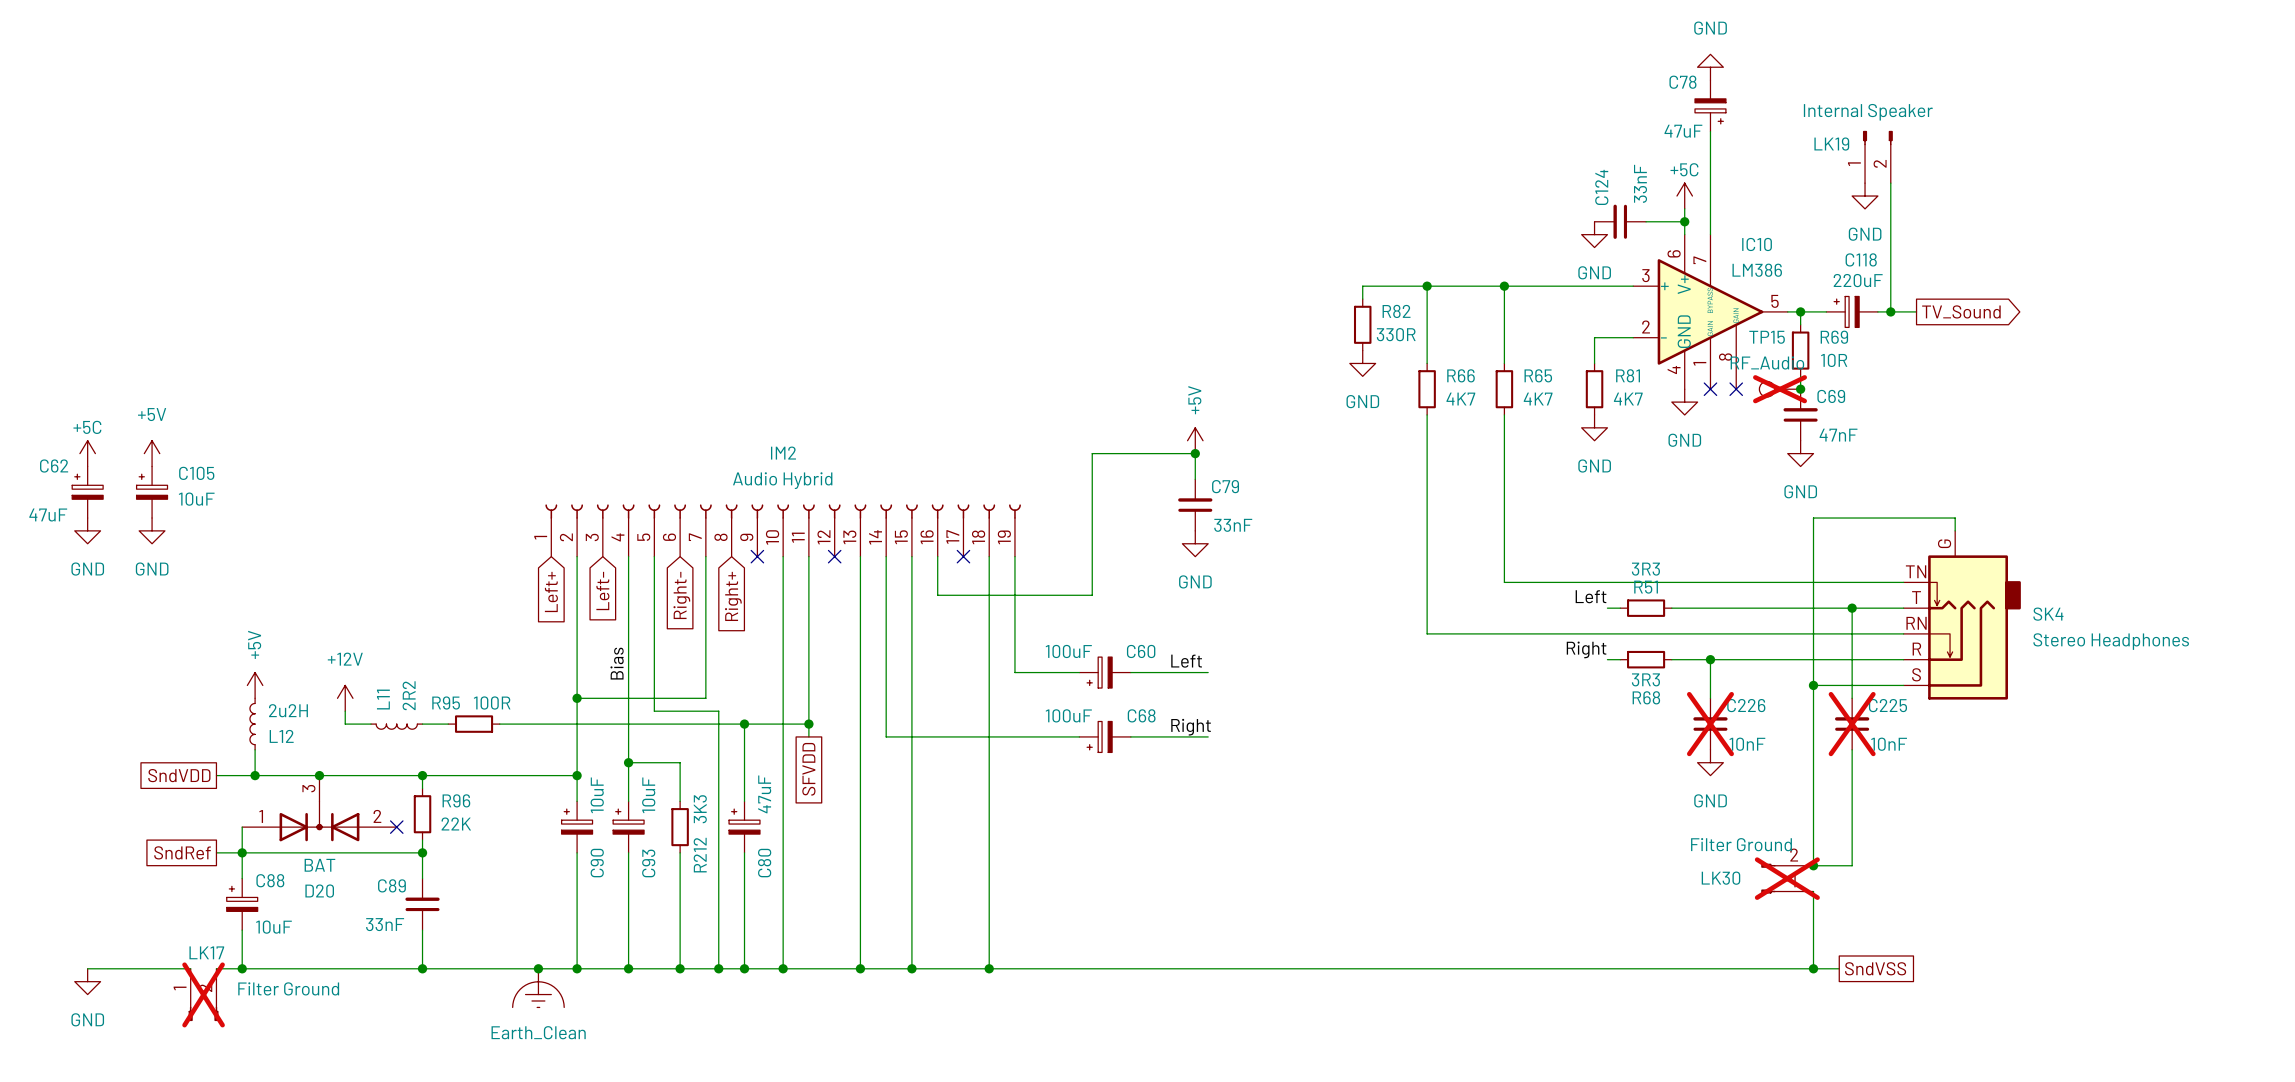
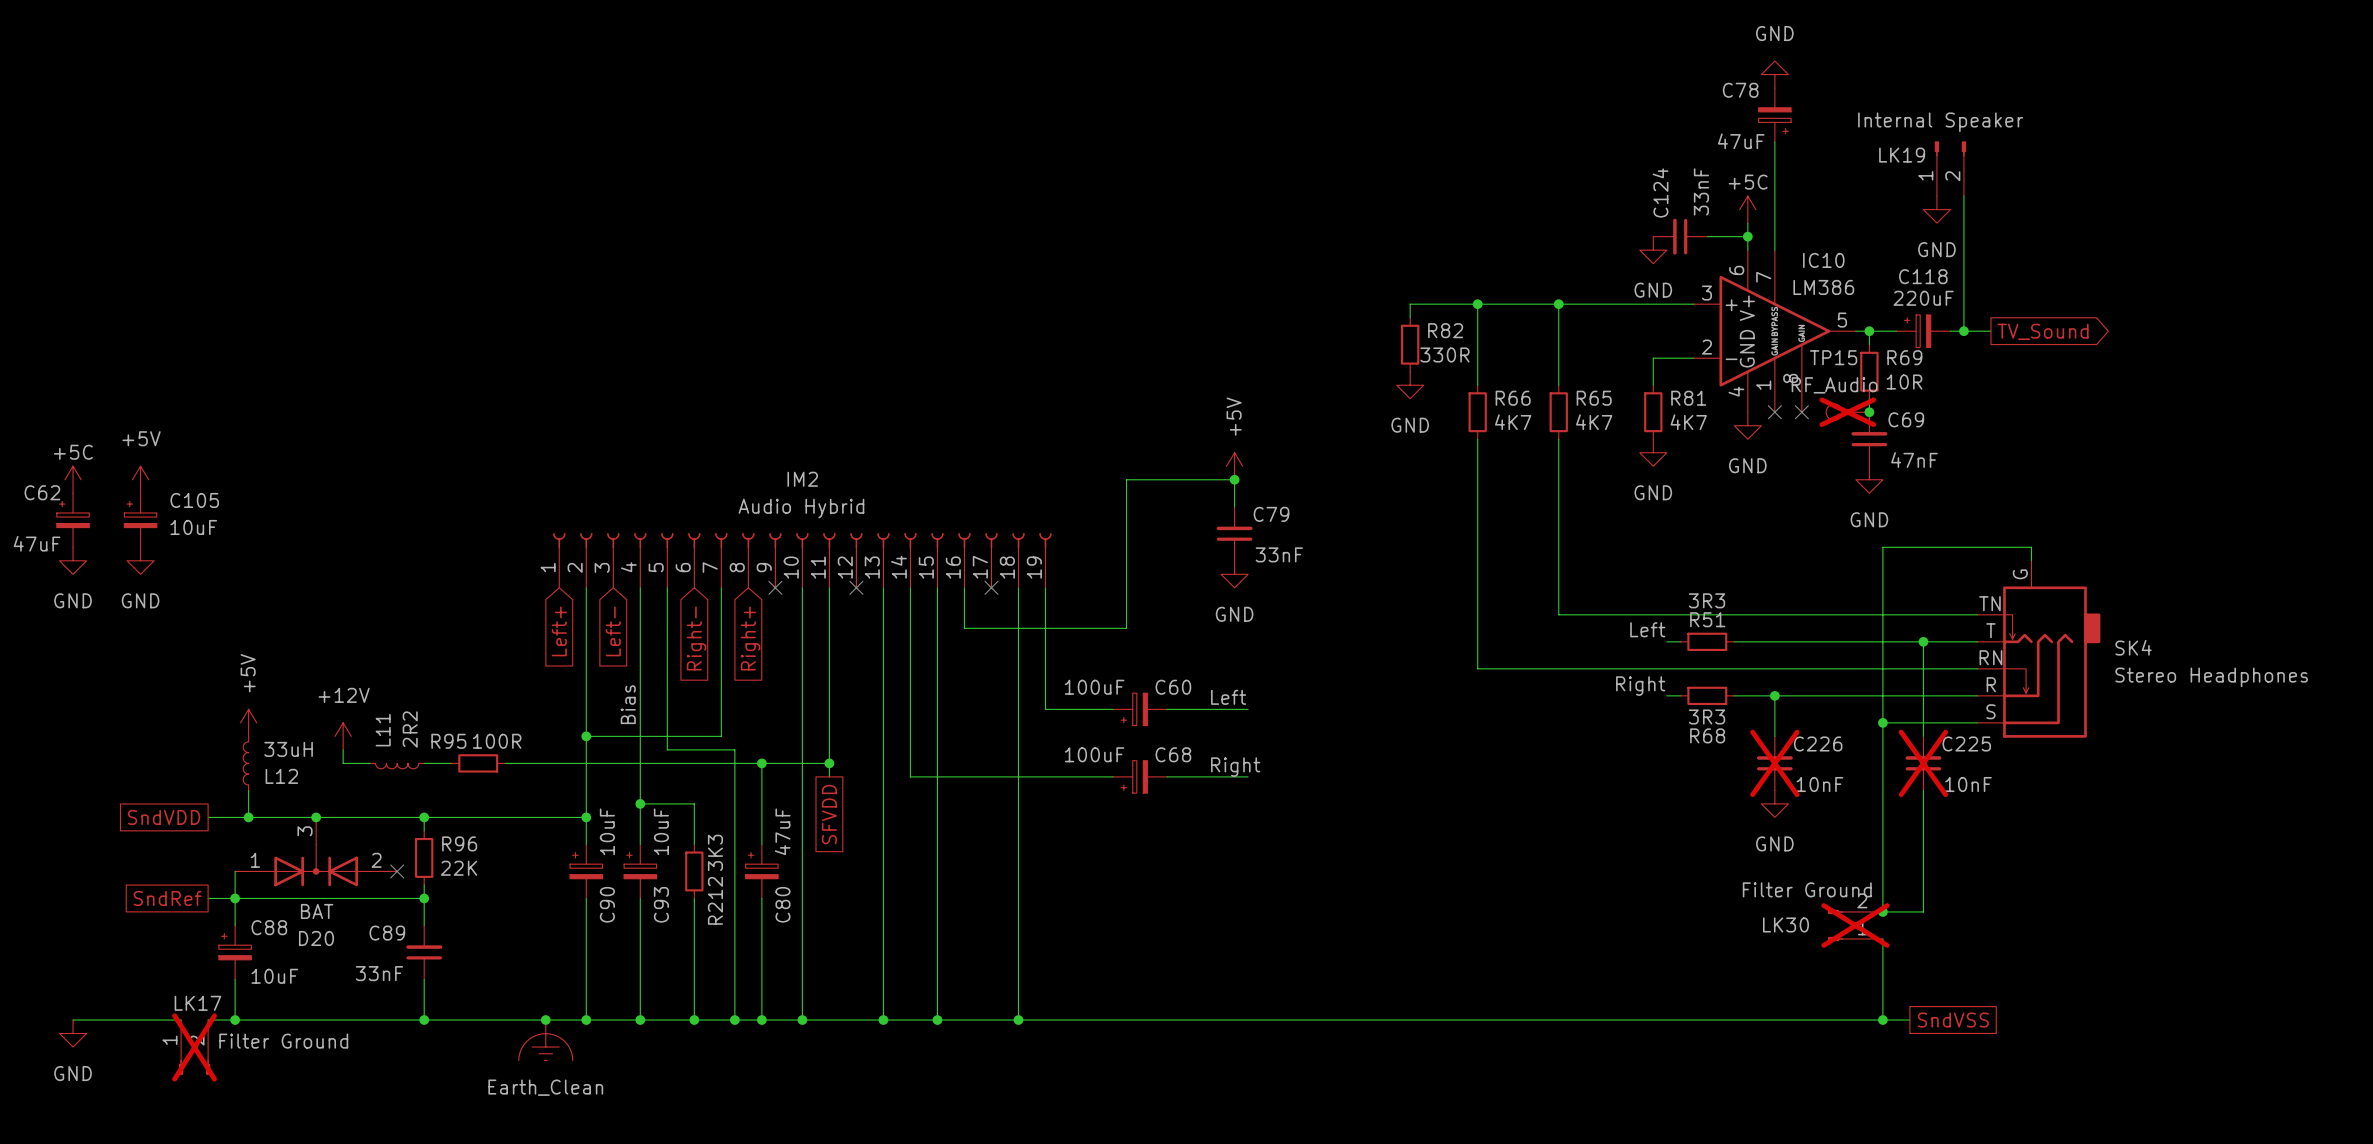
L12 value: 2u2H (288, 710) -> 33uH (288, 749)

